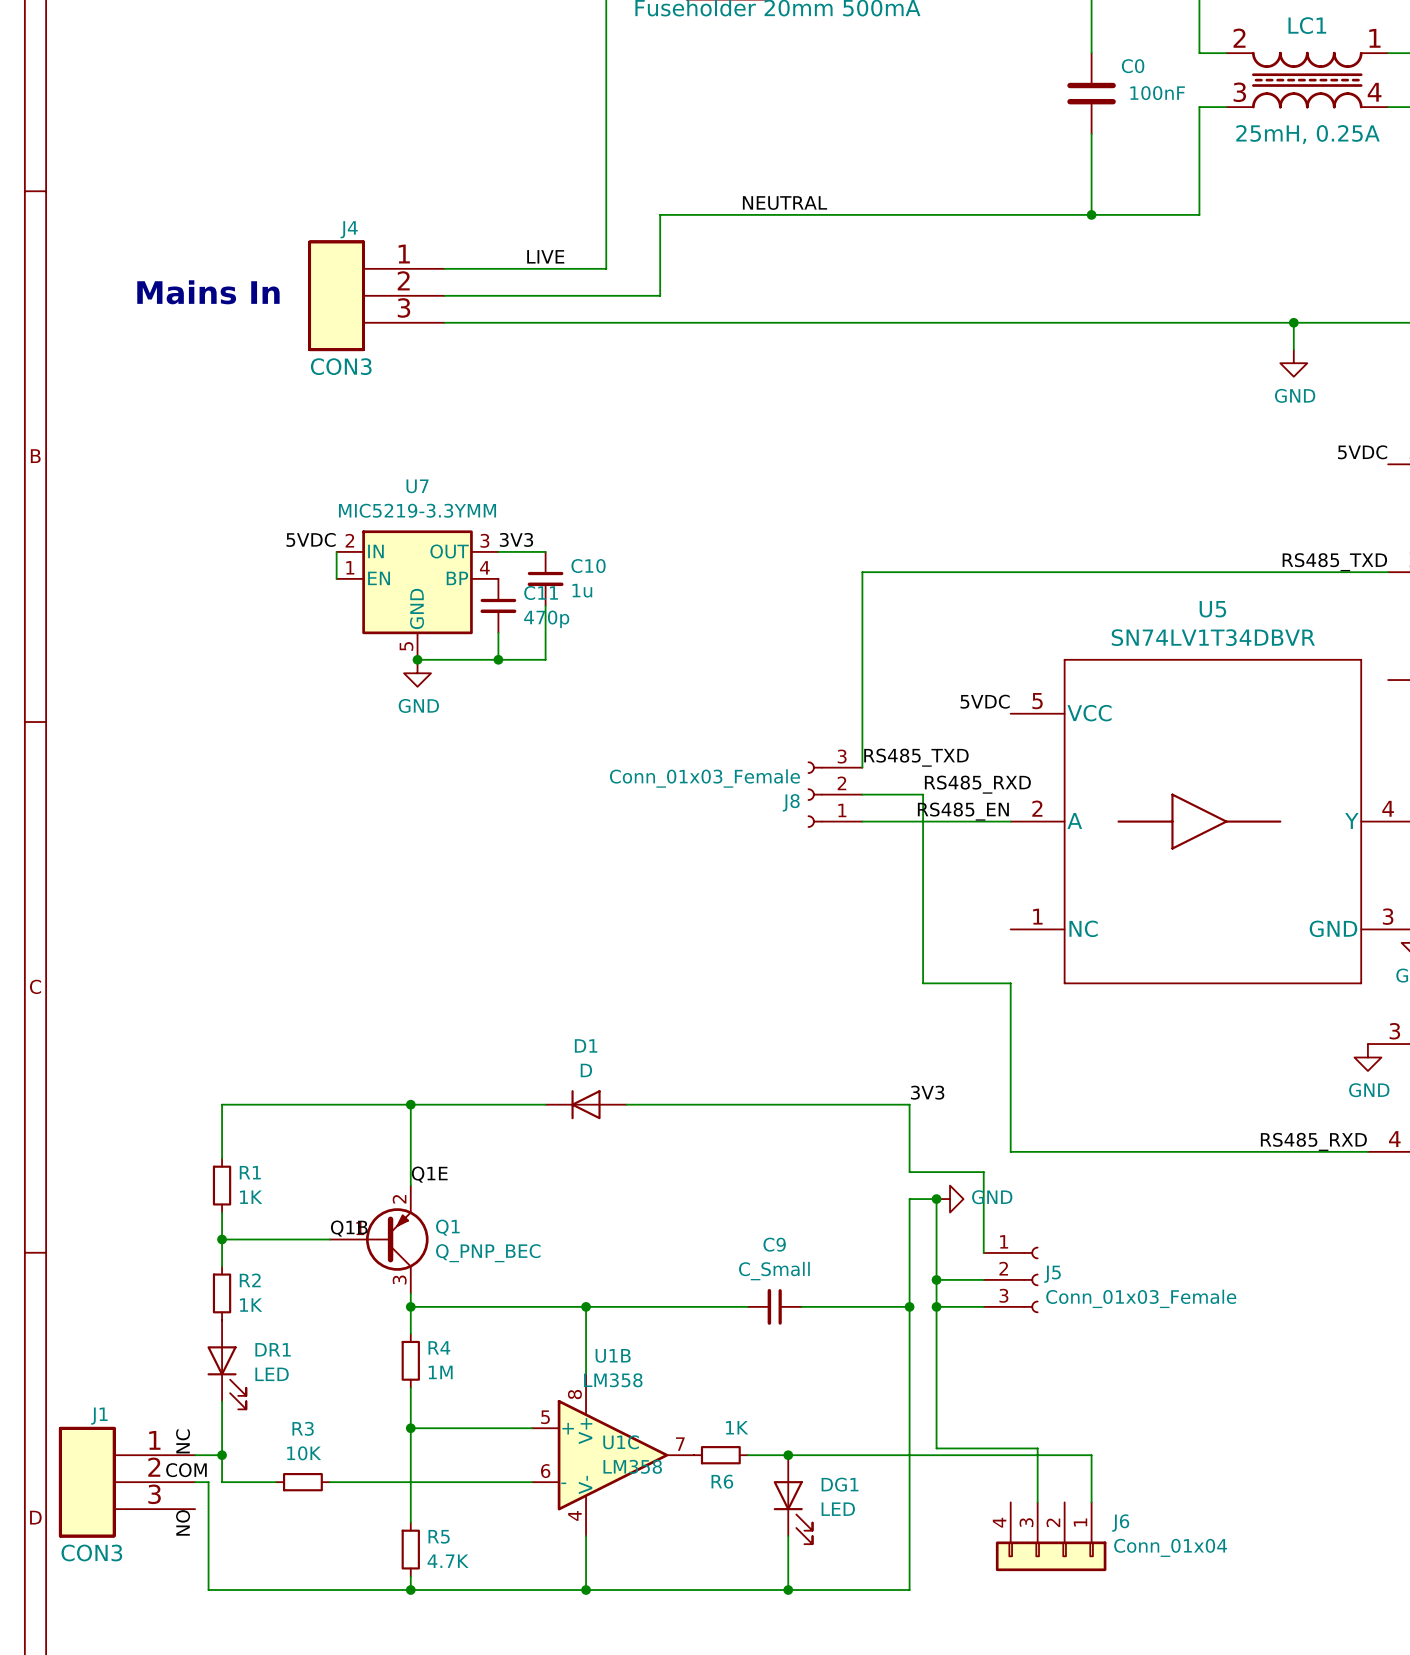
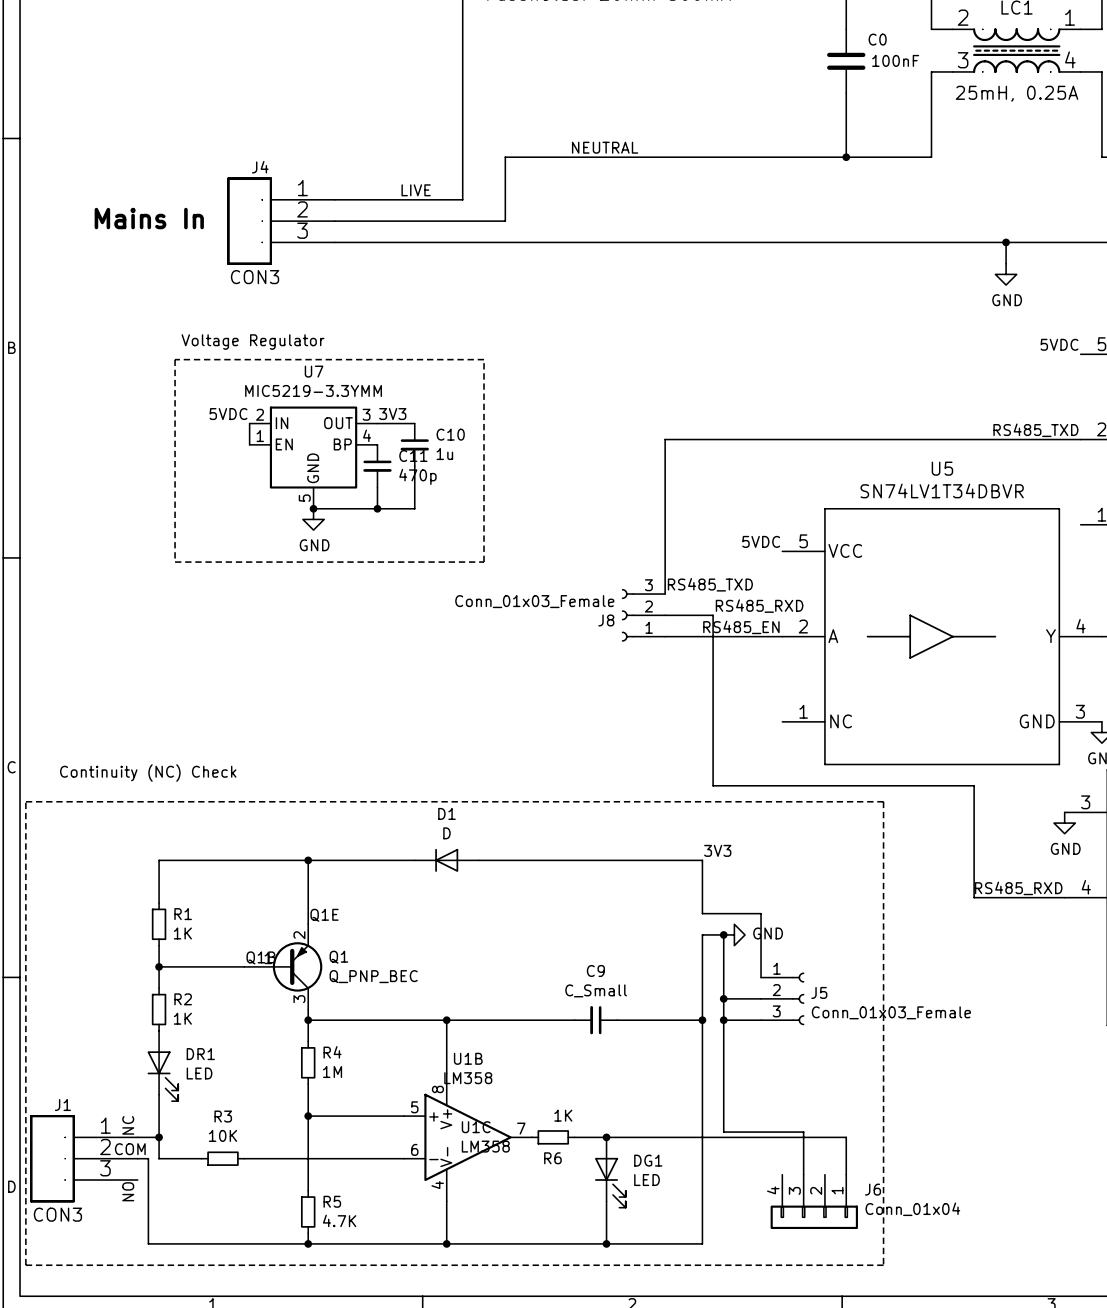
text: none -> Voltage Regulator (253, 342)
line: none -> (175, 359) (175, 562) (484, 562) (484, 359) (175, 359)
wire: (923, 983) (1010, 983) (1010, 1151) (1253, 1151) -> (713, 764) (713, 785) (974, 785) (974, 897)
text: none -> Continuity (NC) Check (148, 773)
line: none -> (25, 801) (25, 1265) (883, 1265) (883, 801) (25, 801)

